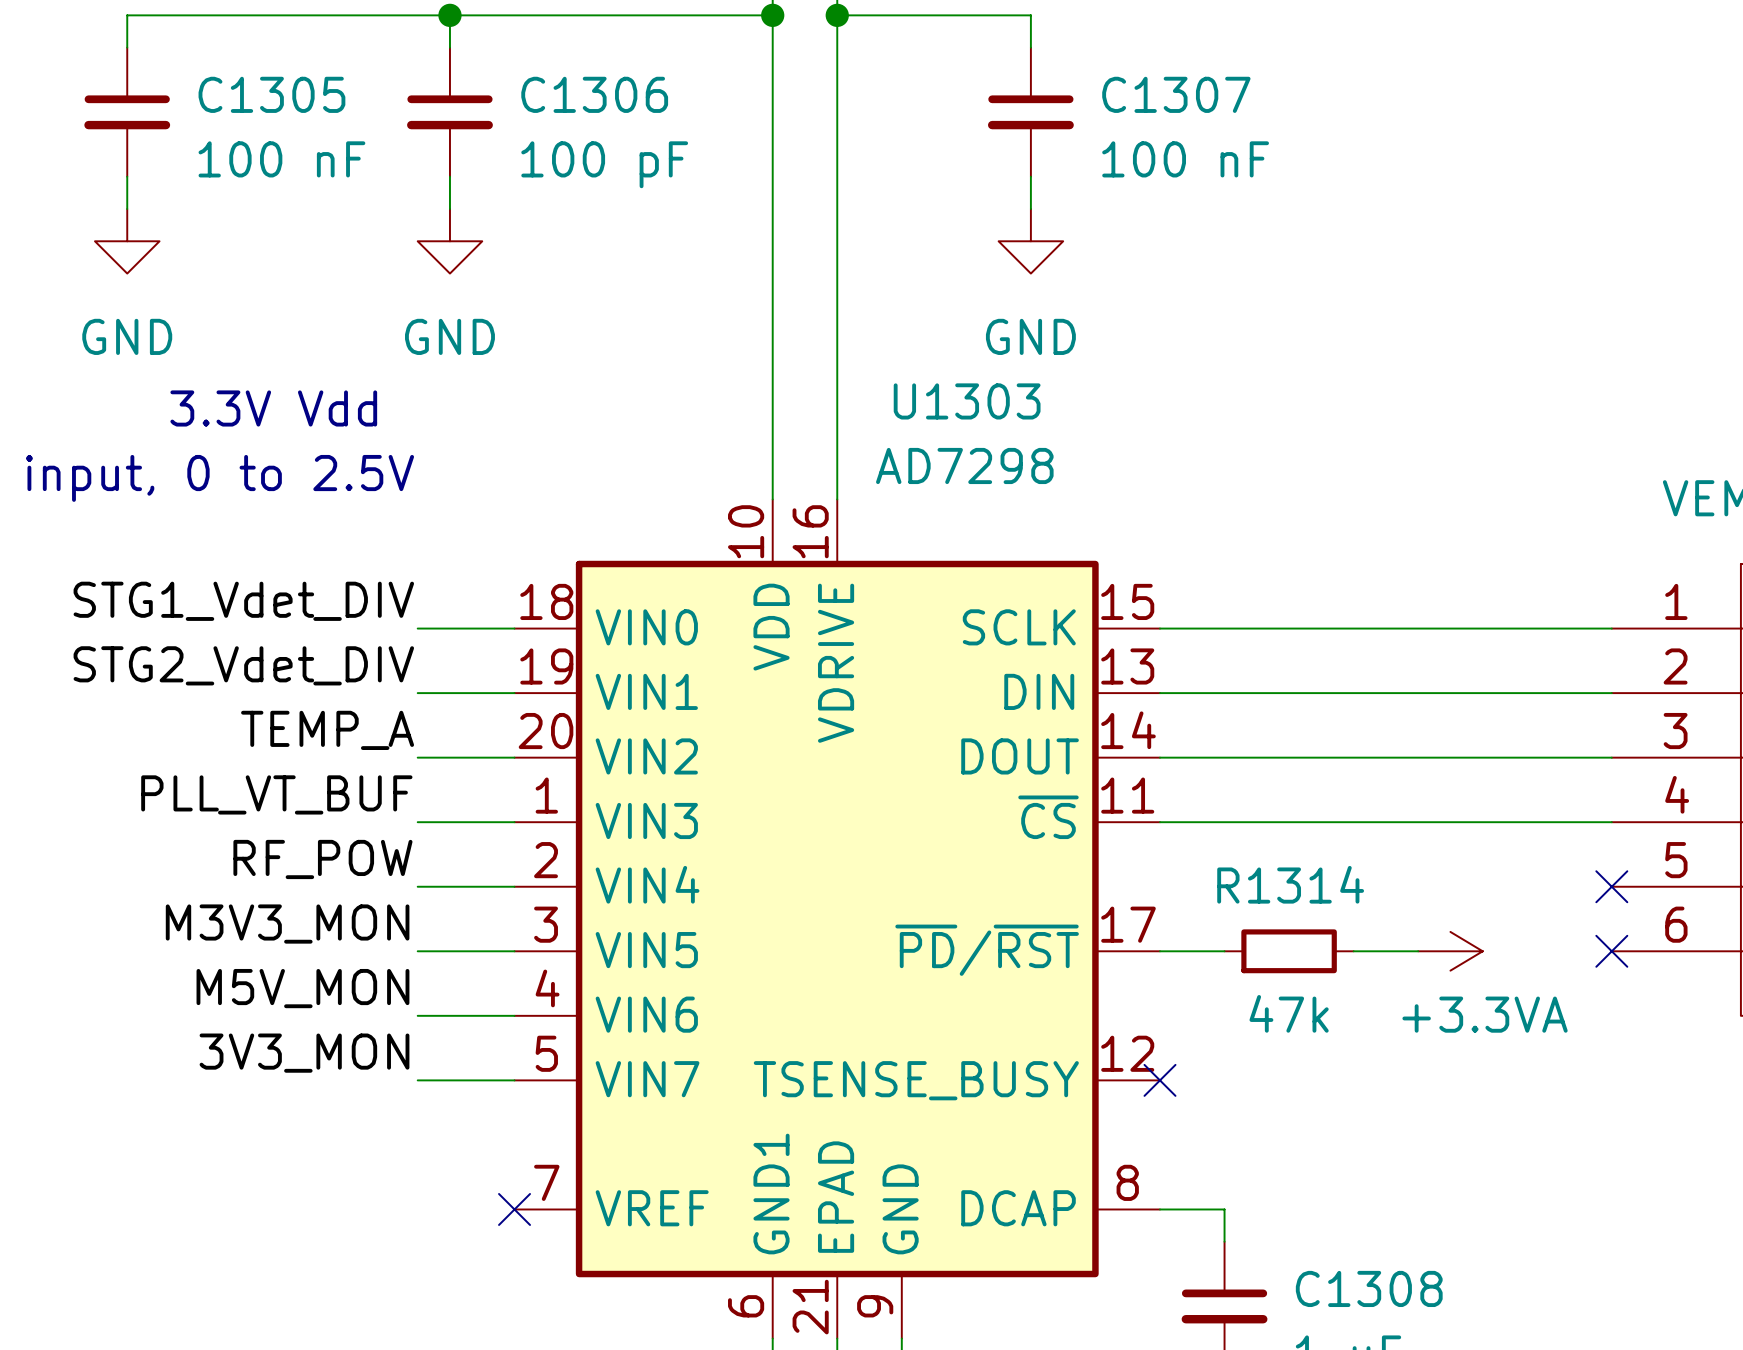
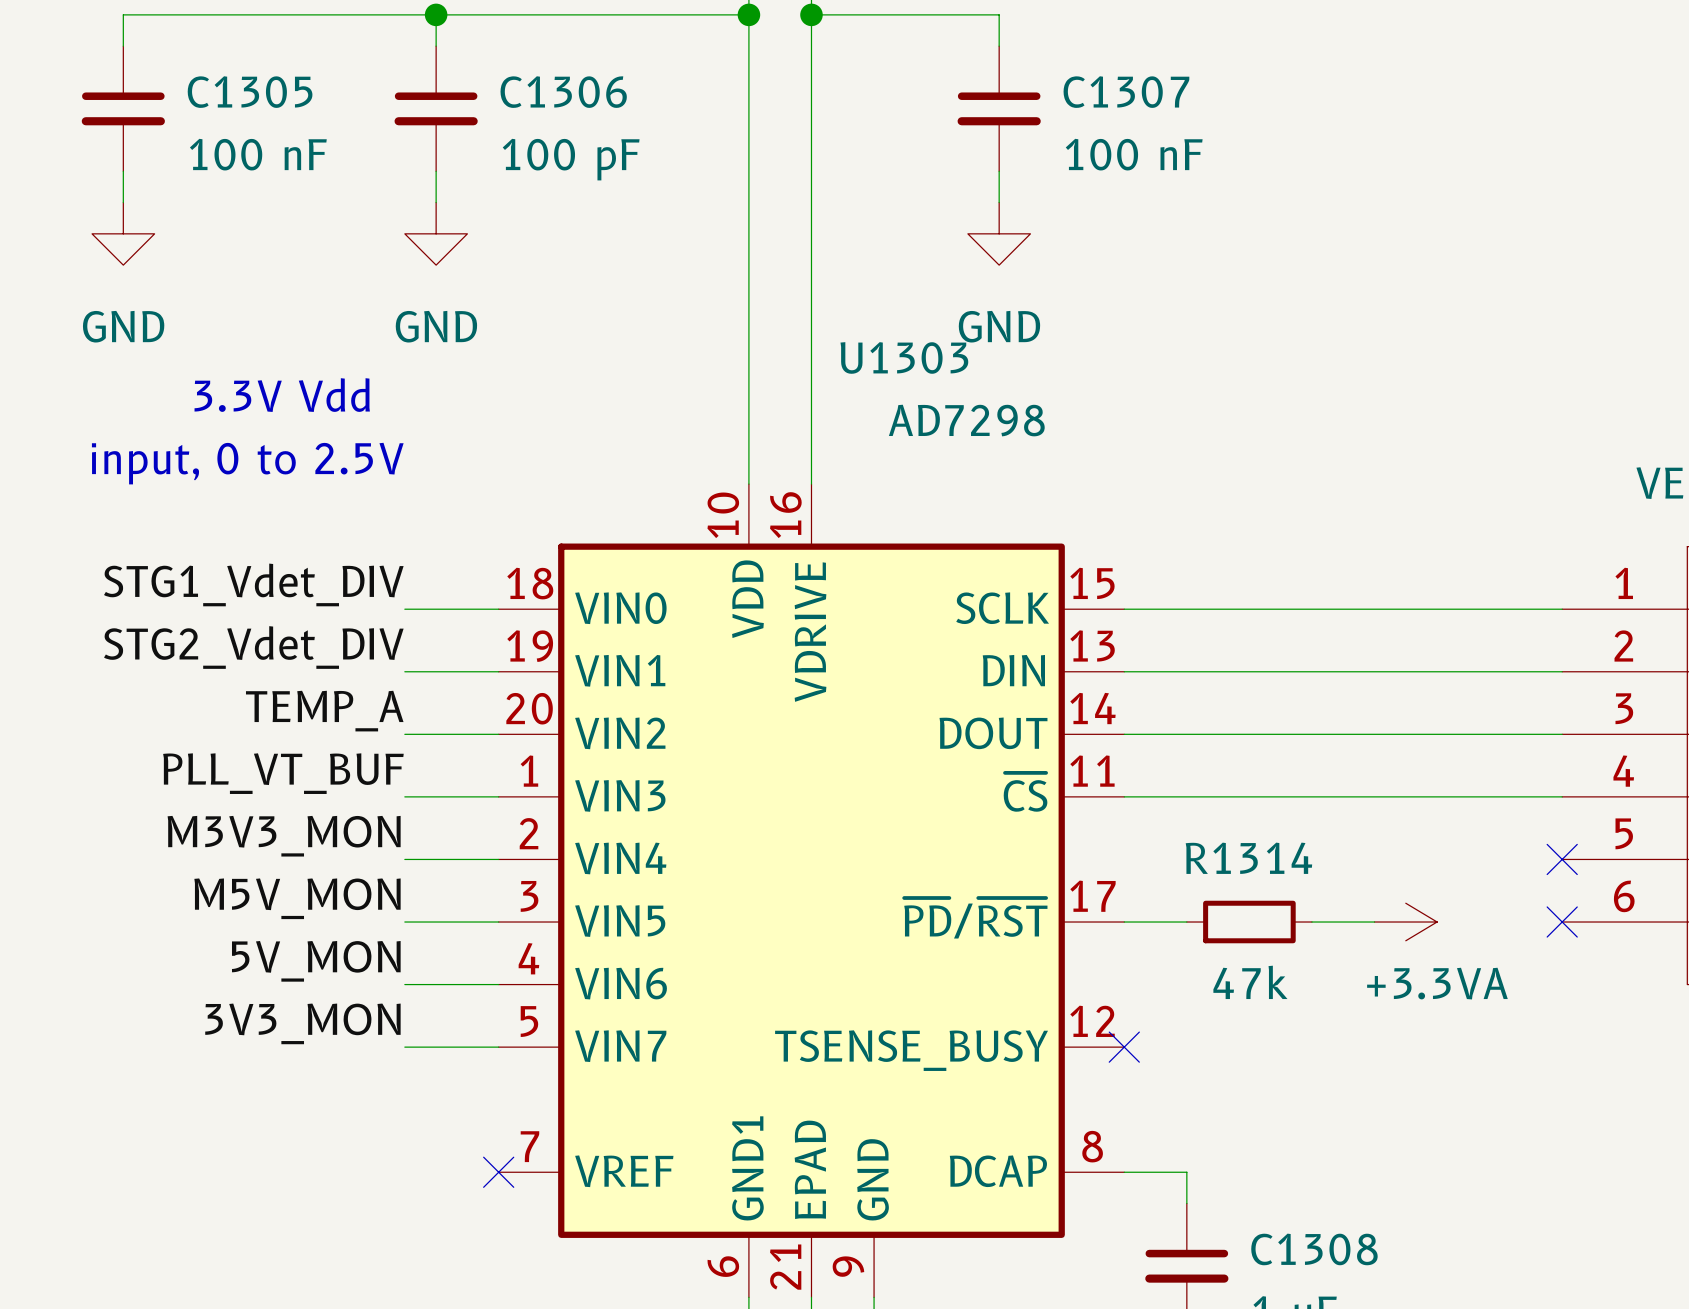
U1303 name position: U1303 (967, 401) -> U1303 (904, 357)
U1303 value position: AD7298 (964, 465) -> AD7298 (966, 420)
label: RF_POW (322, 859) -> M3V3_MON (284, 836)
label: M3V3_MON (287, 924) -> M5V_MON (297, 898)
label: M5V_MON (302, 988) -> 5V_MON (316, 961)

